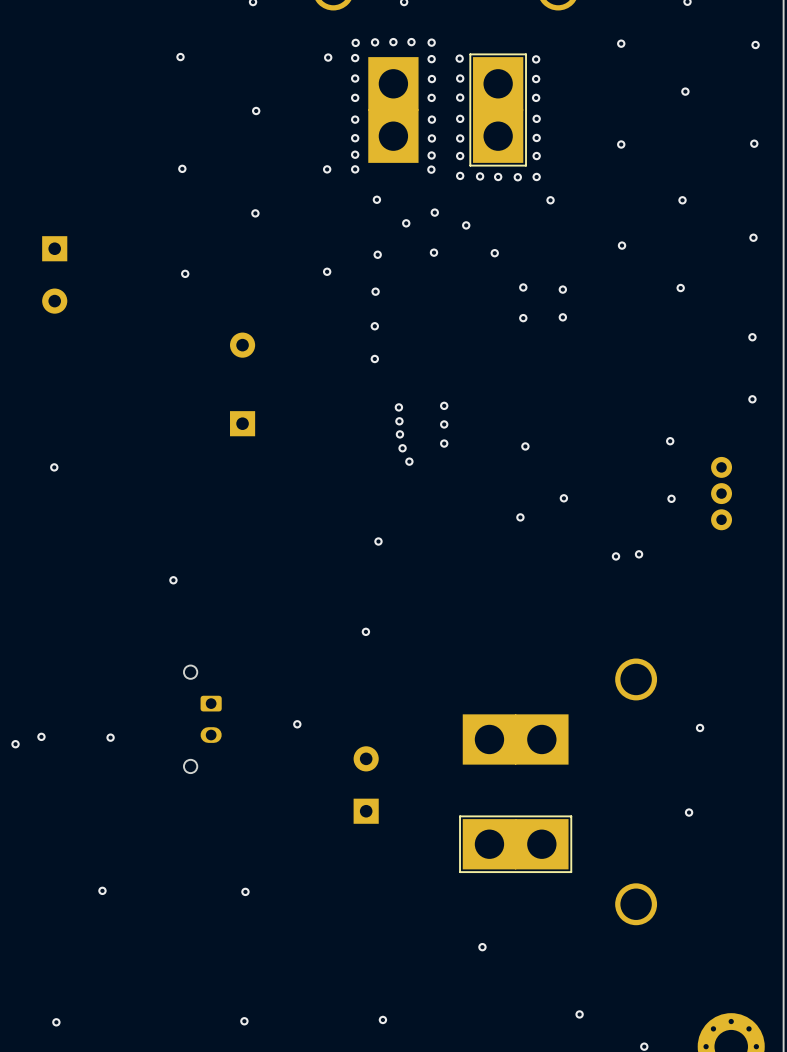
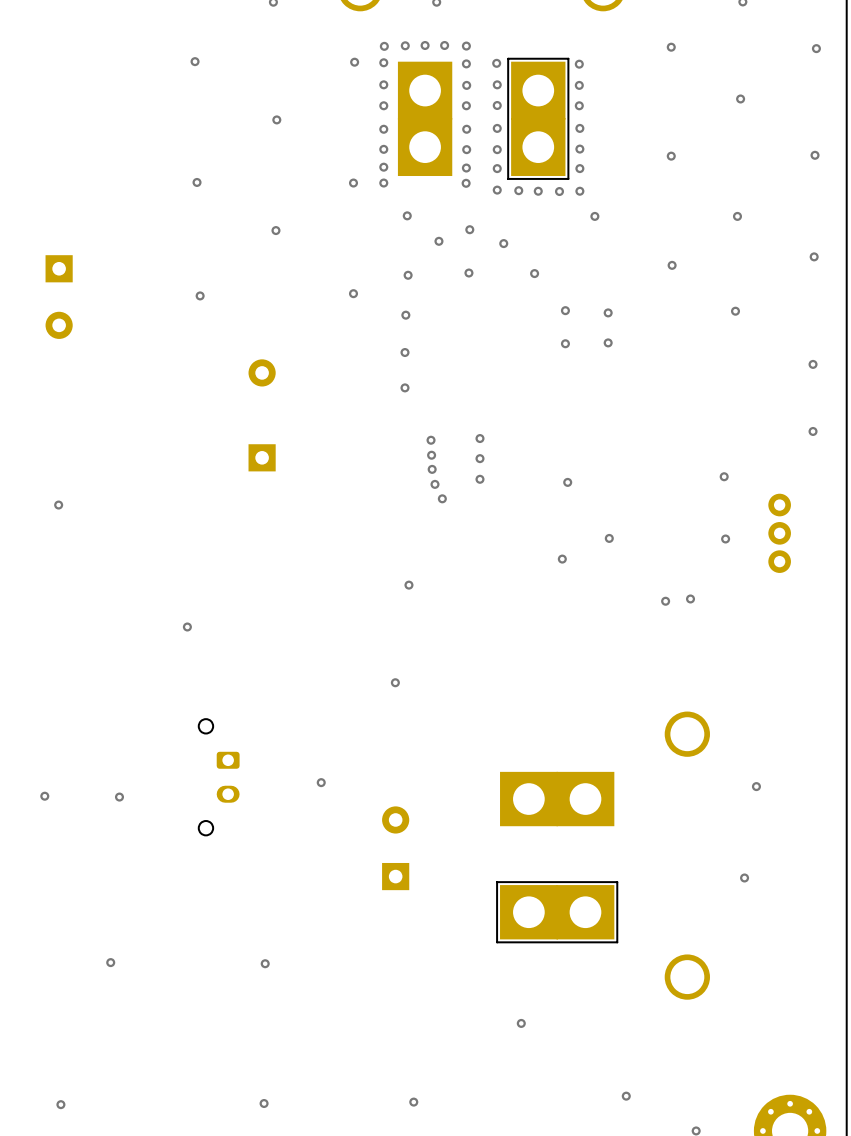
via: (15, 744) -> none

